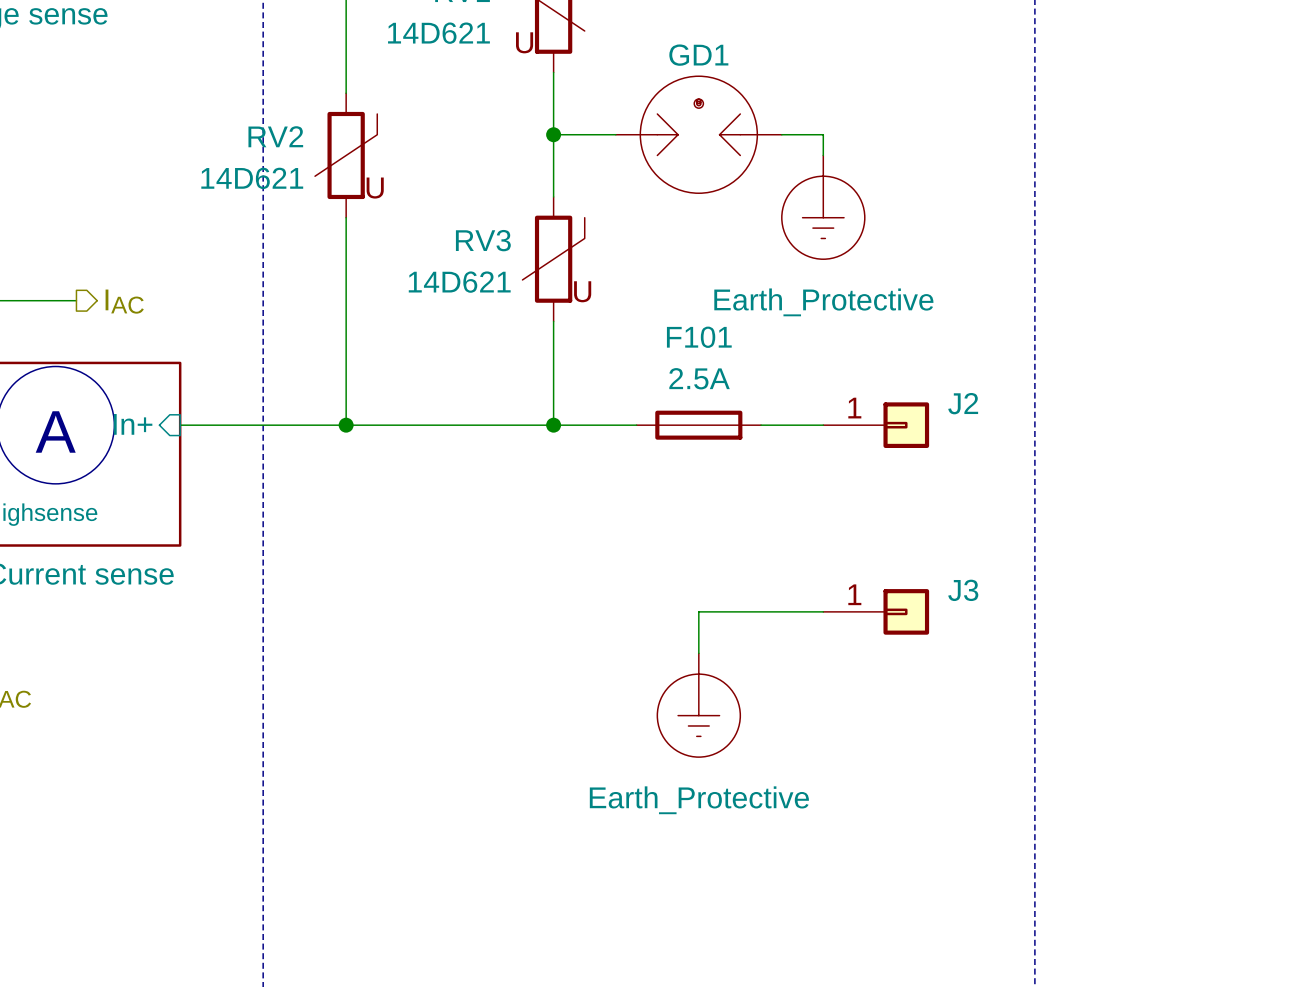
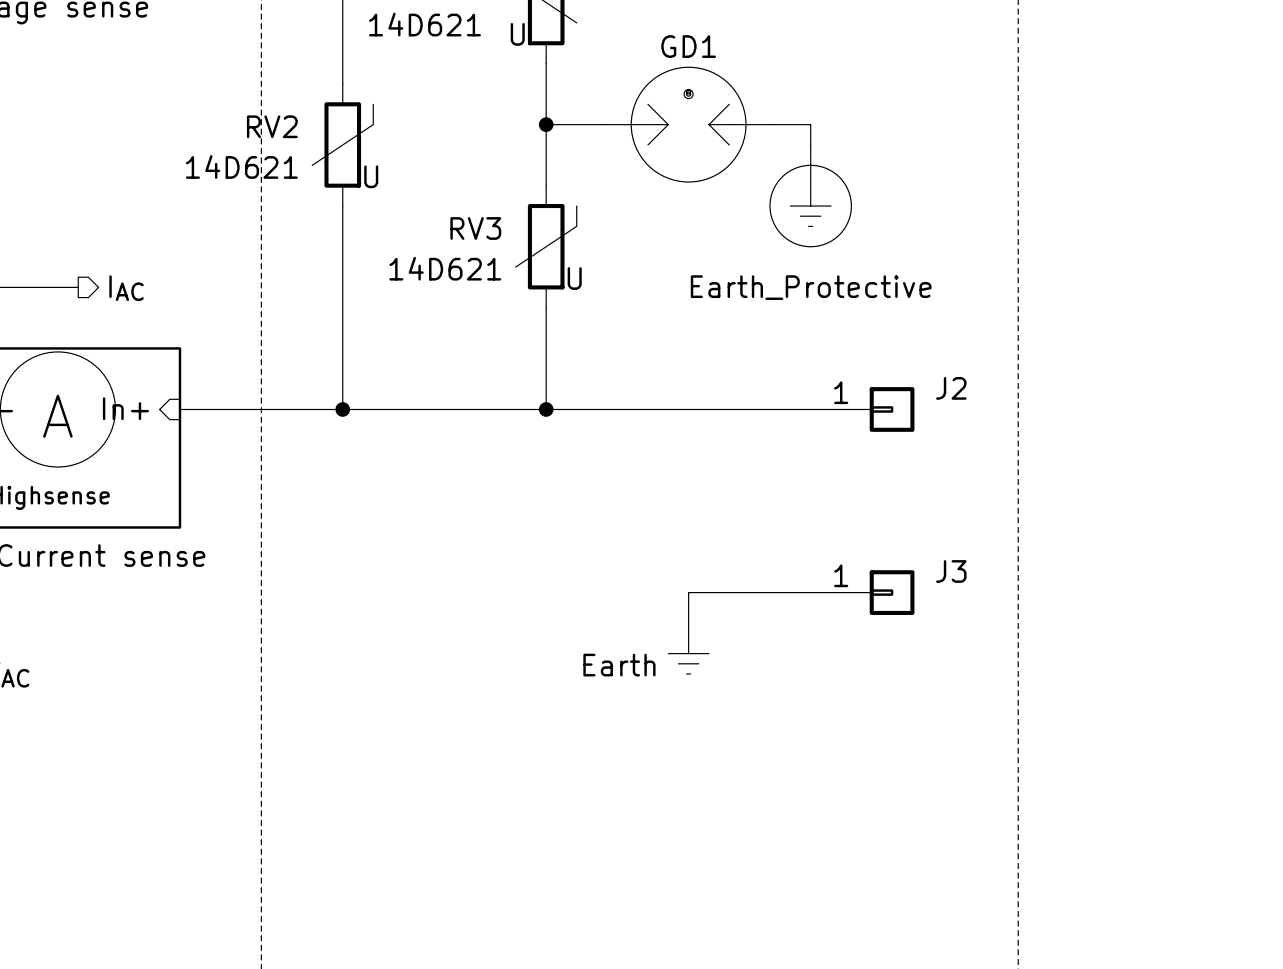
F101: 2.5A (698, 425) -> none
power symbol: none -> Earth (688, 653)
power symbol: Earth_Protective (698, 705) -> none

